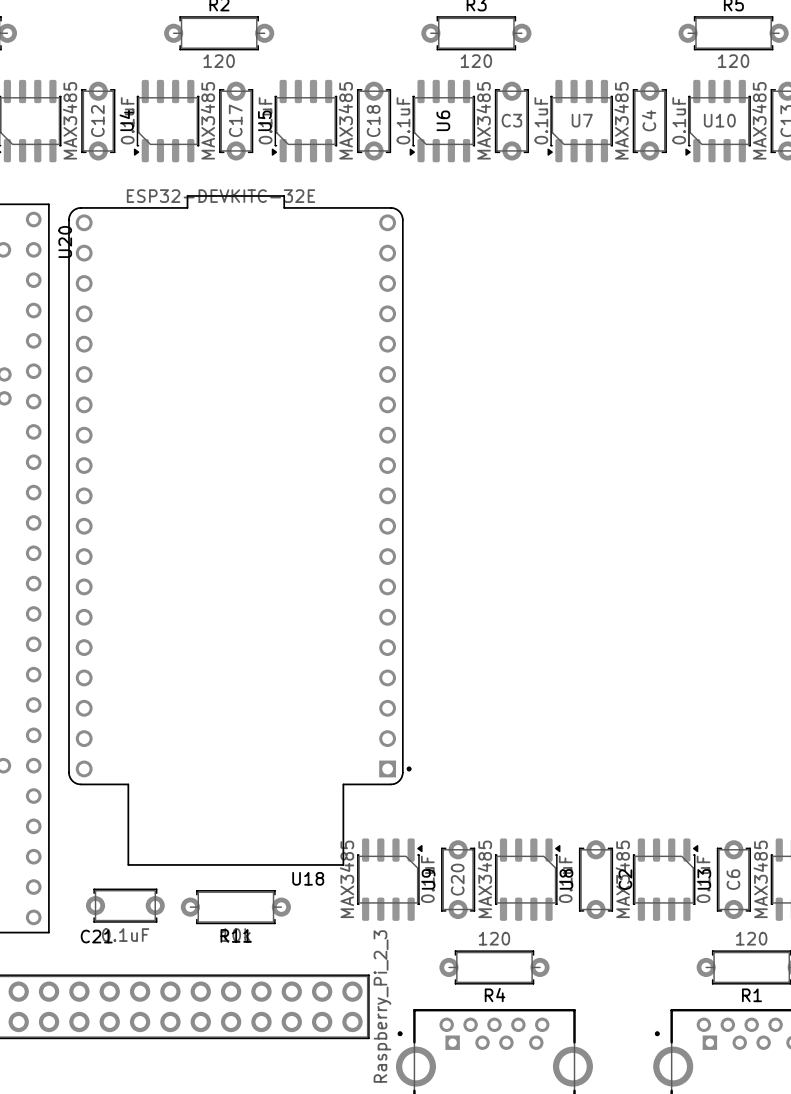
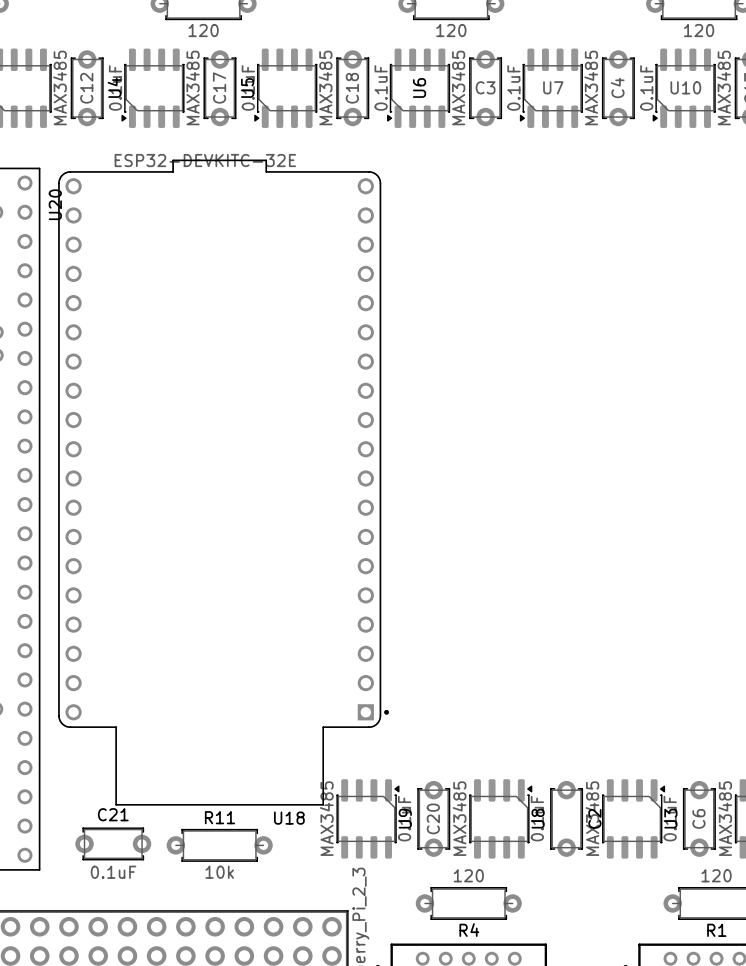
R11 name position: R11 (236, 935) -> R11 (219, 817)
C21 name position: C21 (96, 936) -> C21 (113, 814)

